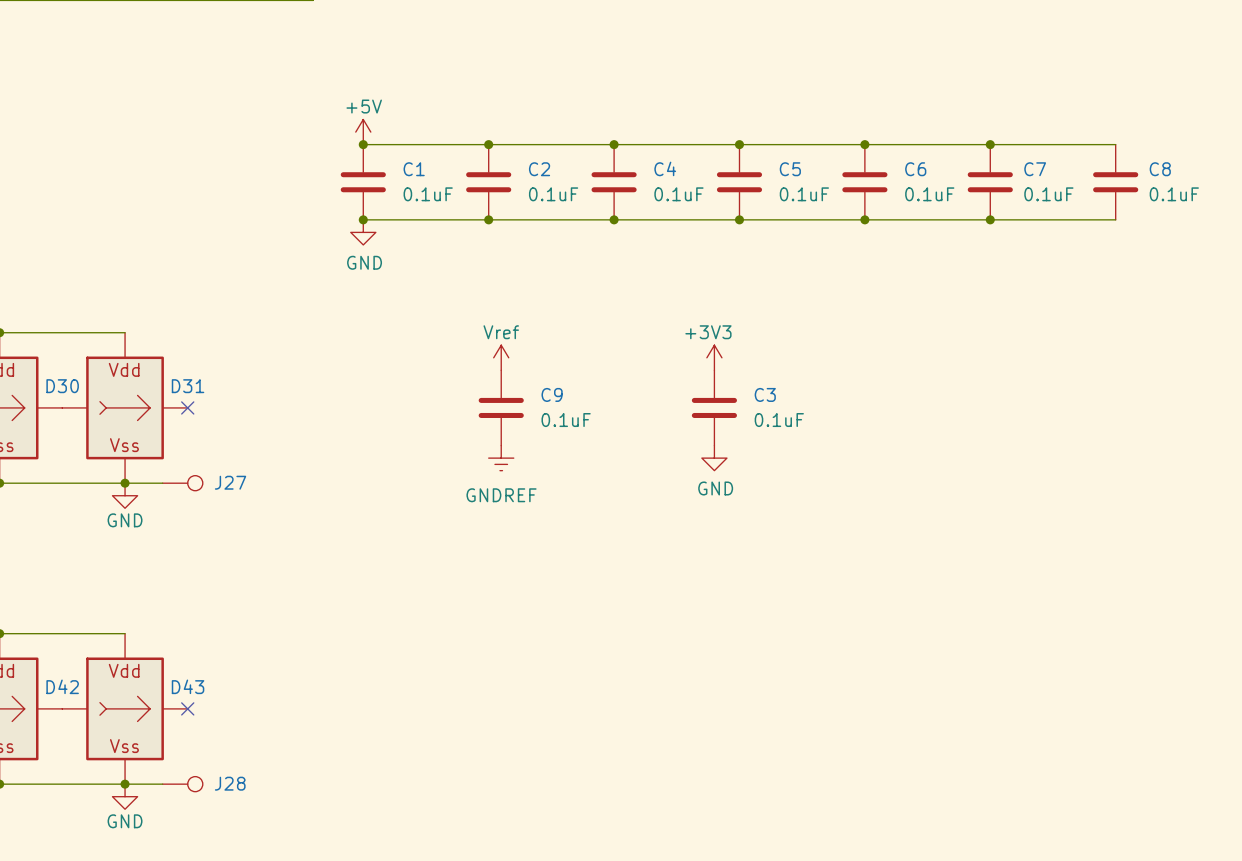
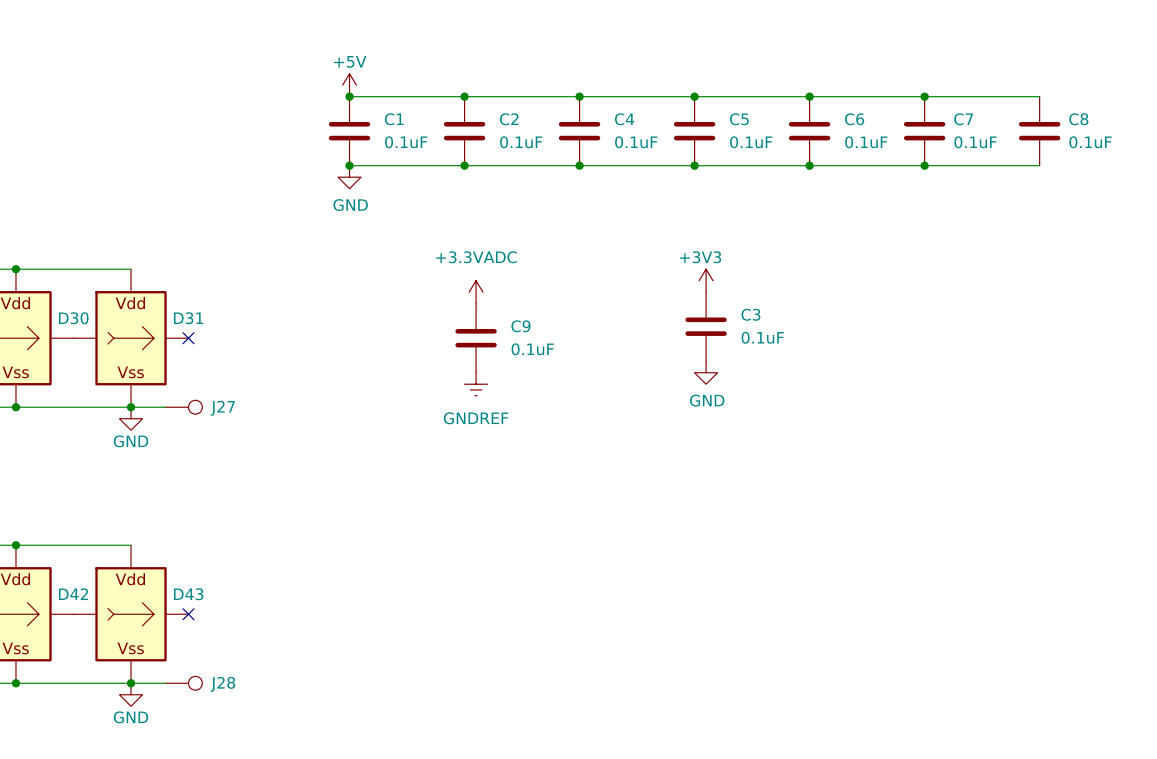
power symbol: Vref (501, 357) -> +3.3VADC (476, 292)
power symbol position: +3V3 (714, 357) -> +3V3 (706, 280)
C3 position: (714, 407) -> (706, 326)
power symbol position: GND (714, 458) -> GND (706, 372)

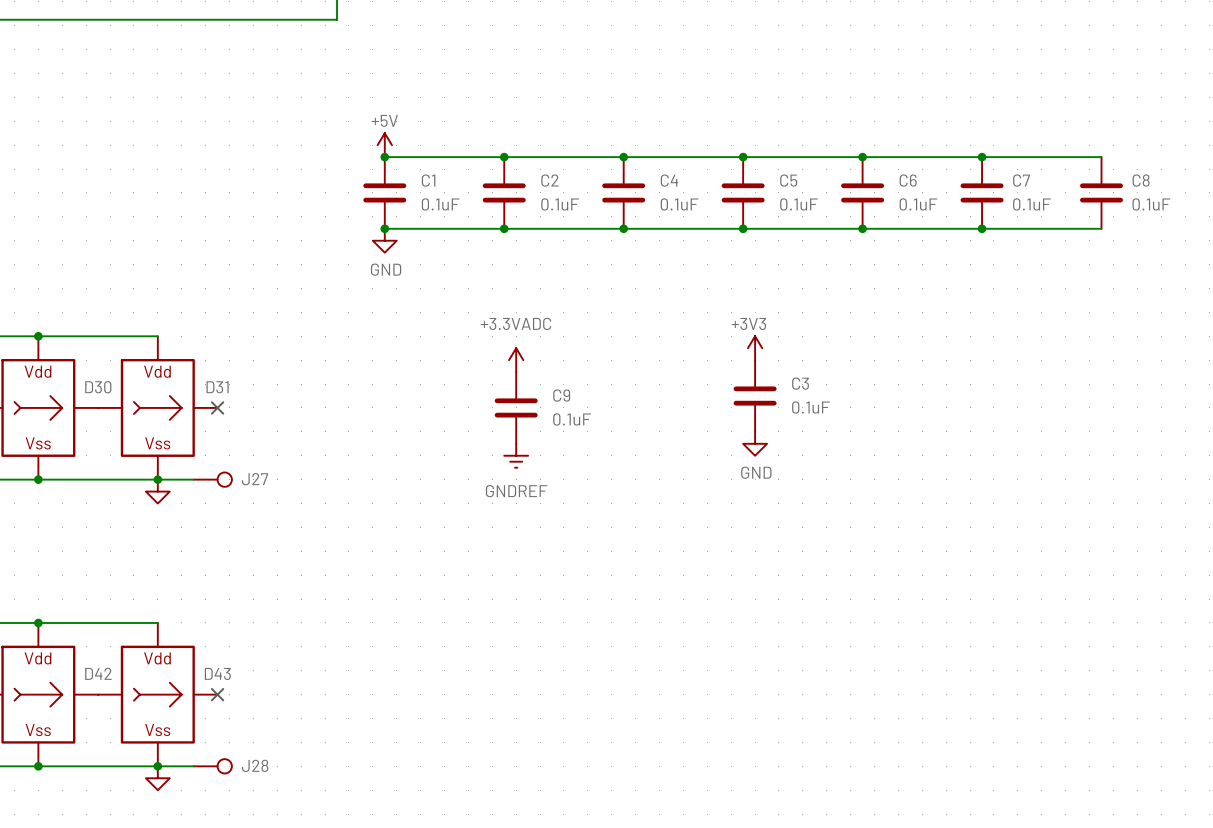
power symbol text: GND (130, 441) -> none
power symbol text: GND (130, 717) -> none

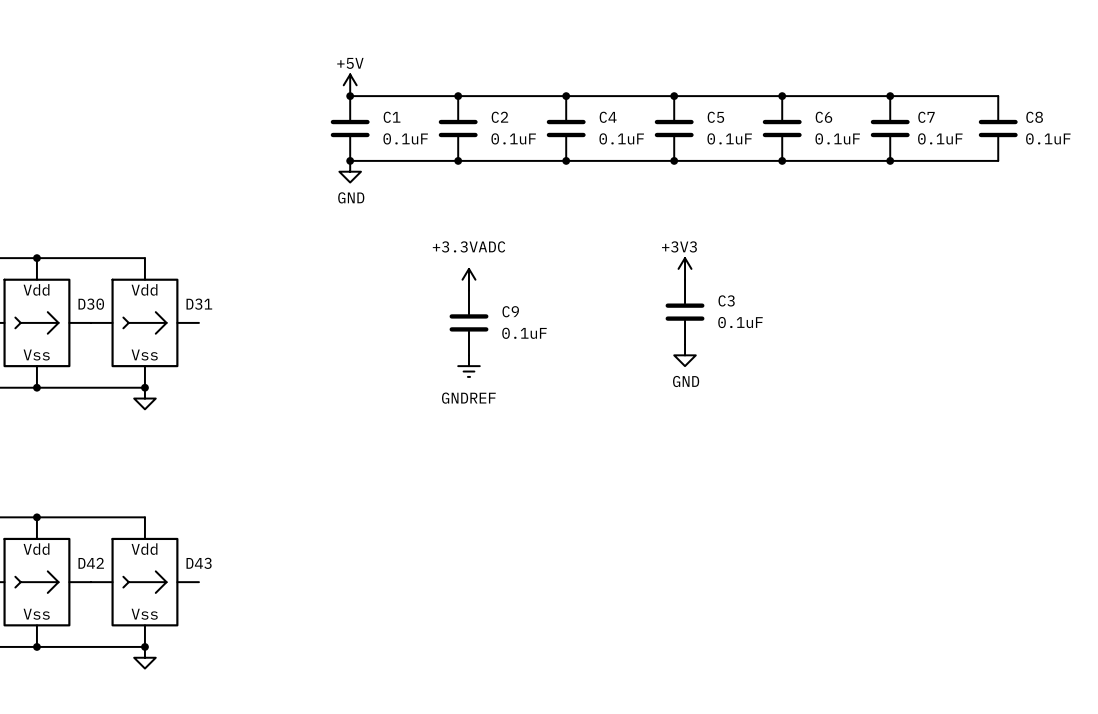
no-connect mark: (217, 407) -> none
wire: (157, 479) (193, 479) -> none
J27: (212, 479) -> none
no-connect mark: (217, 694) -> none
wire: (157, 766) (193, 766) -> none
J28: (212, 766) -> none

